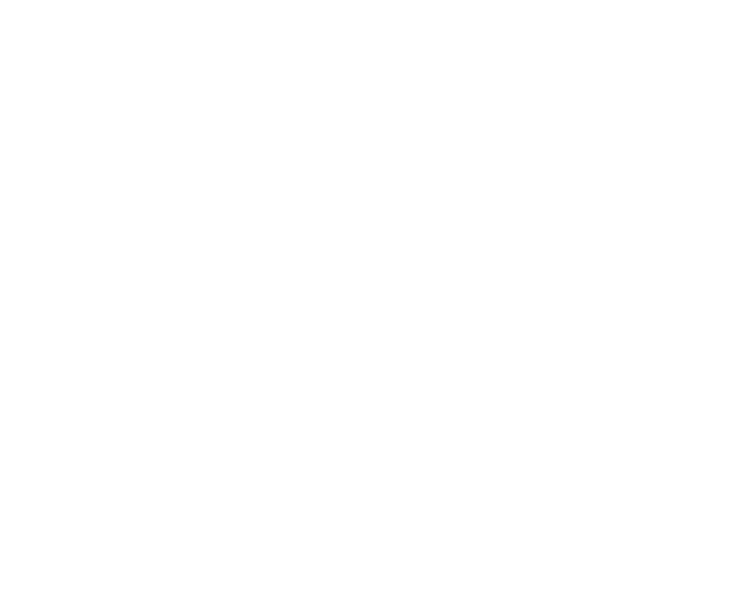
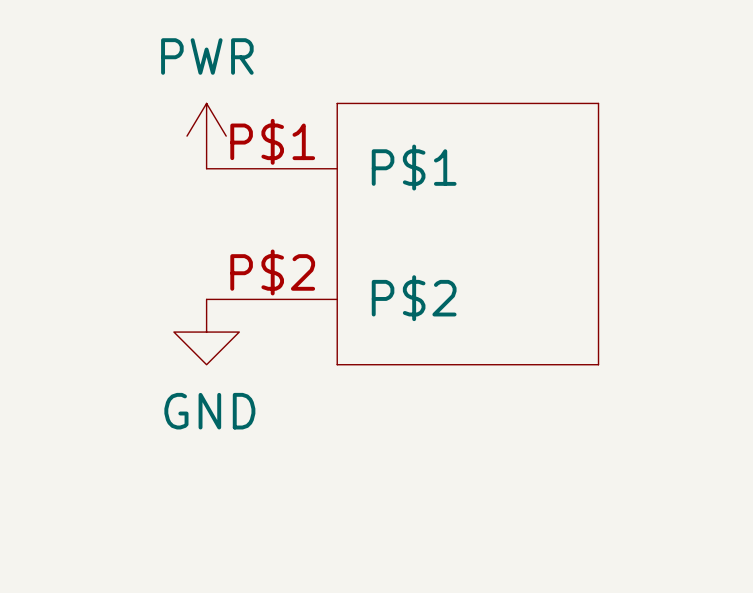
power symbol: none -> PWR (206, 136)
part: none -> (402, 234)
power symbol: none -> GND (206, 332)

